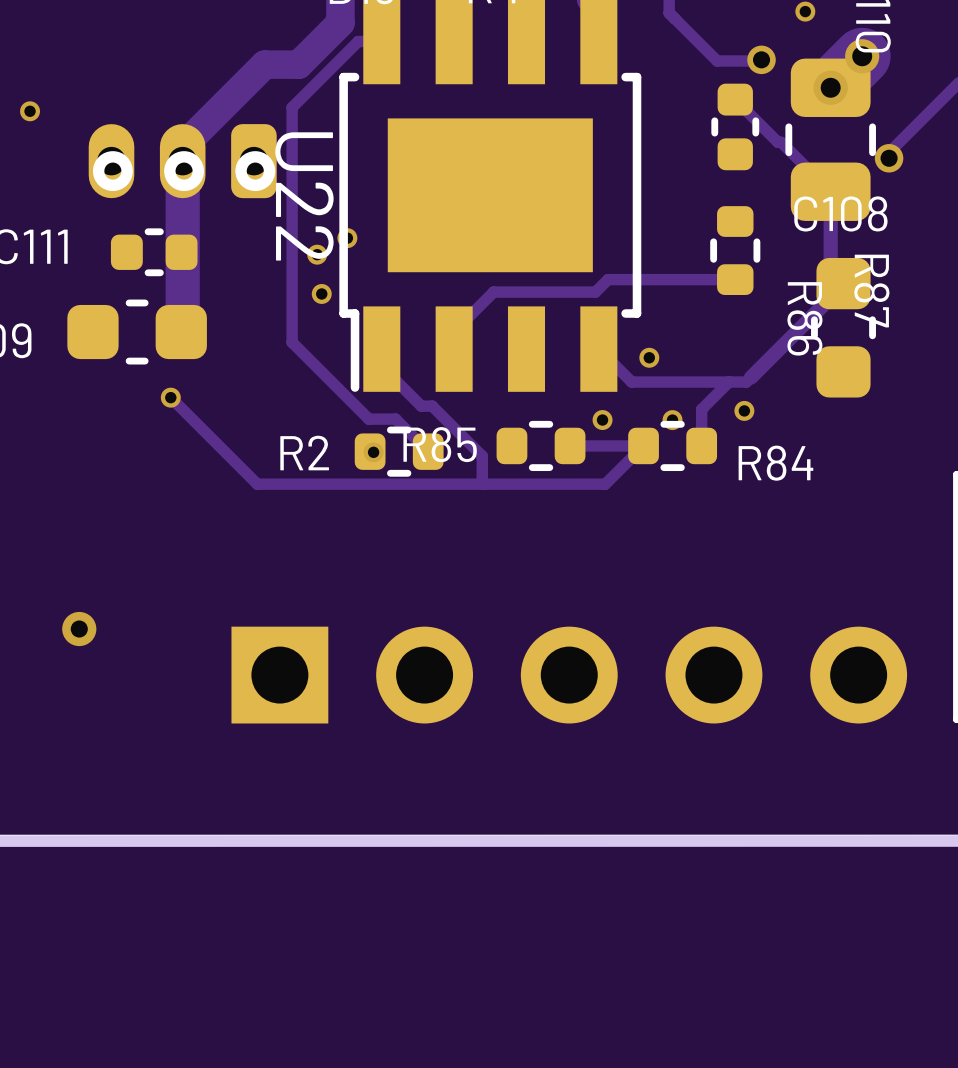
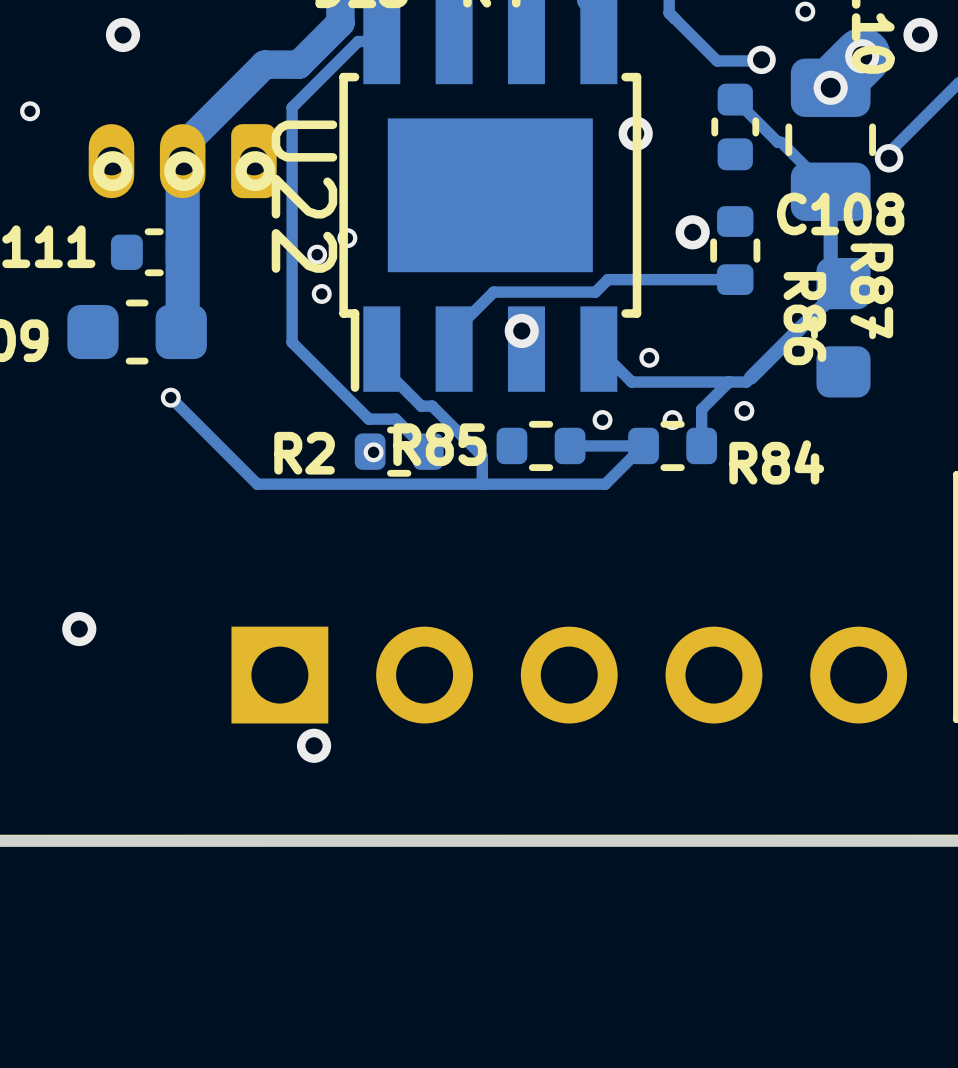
via: none -> (123, 34)
via: none -> (920, 34)
via: none -> (635, 133)
via: none -> (692, 232)
via: none -> (521, 330)
via: none -> (314, 745)

